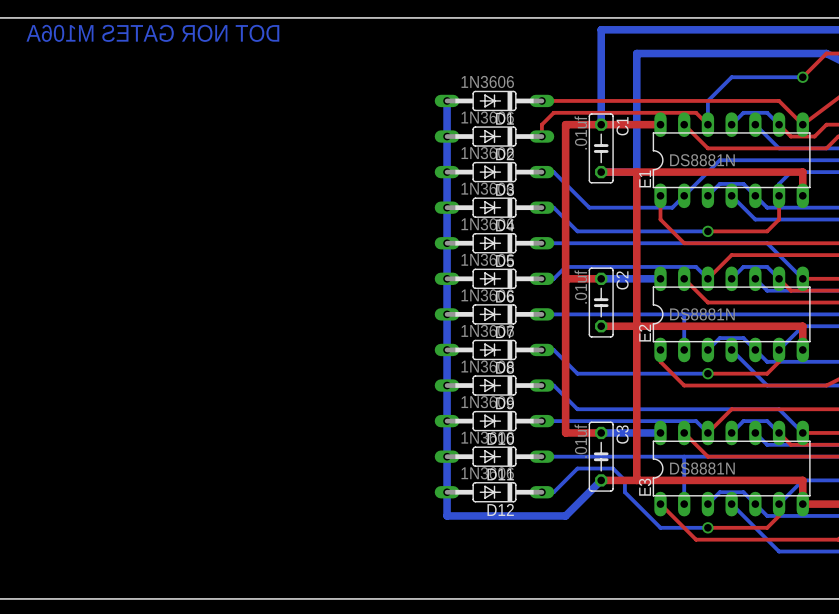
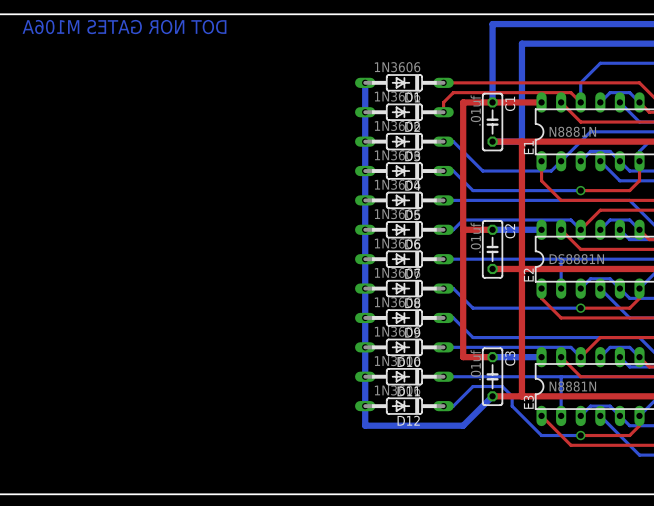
E1 value: DS8881N (702, 160) -> N8881N (572, 131)
E3 value: DS8881N (702, 468) -> N8881N (572, 386)

